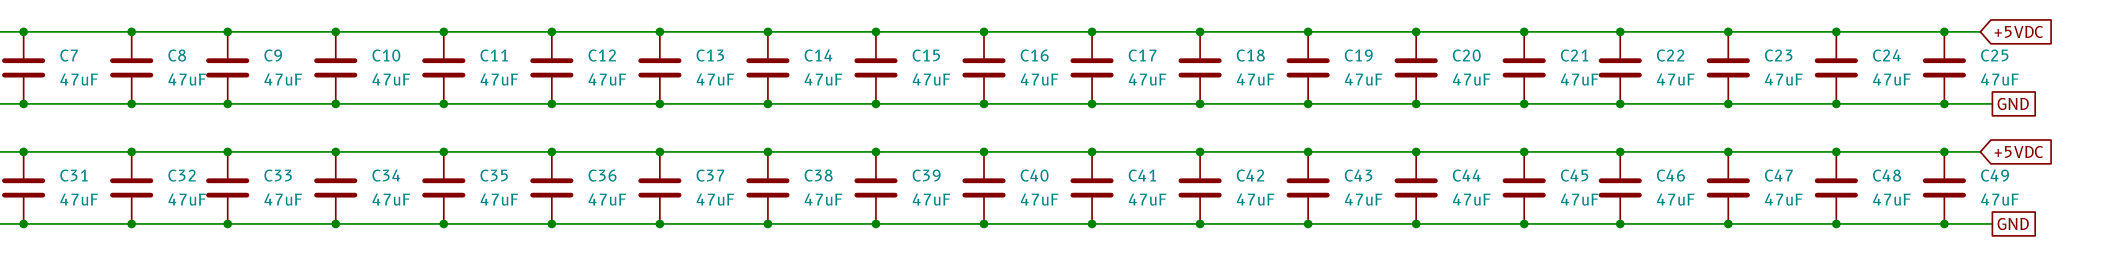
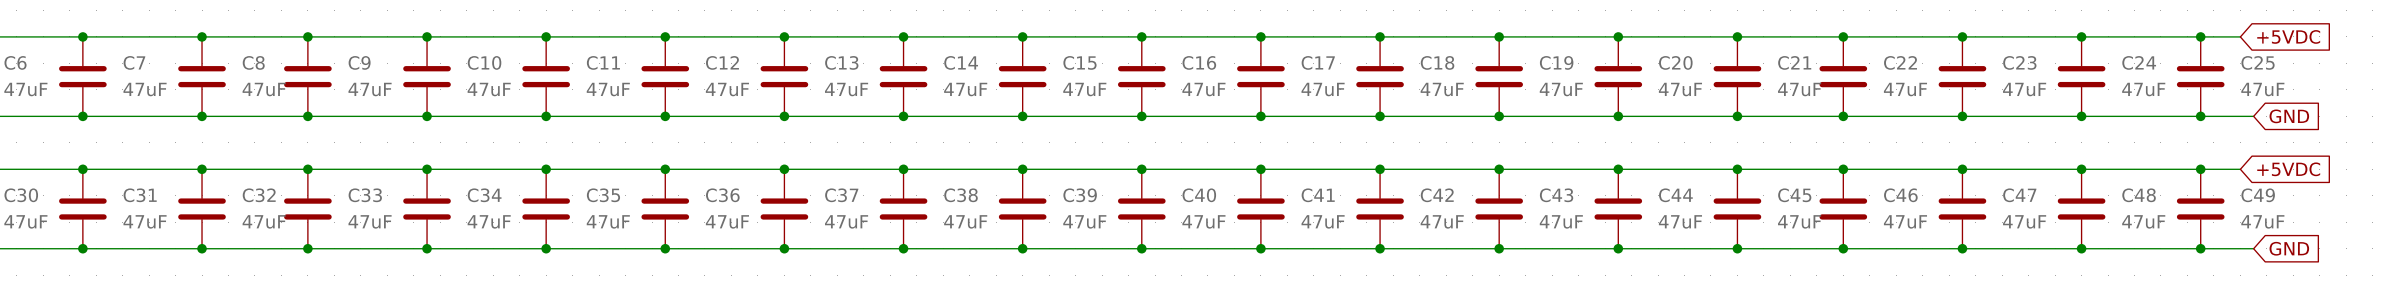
global label shape: passive (2013, 103) -> input (2289, 116)
global label shape: passive (2013, 224) -> input (2289, 248)

